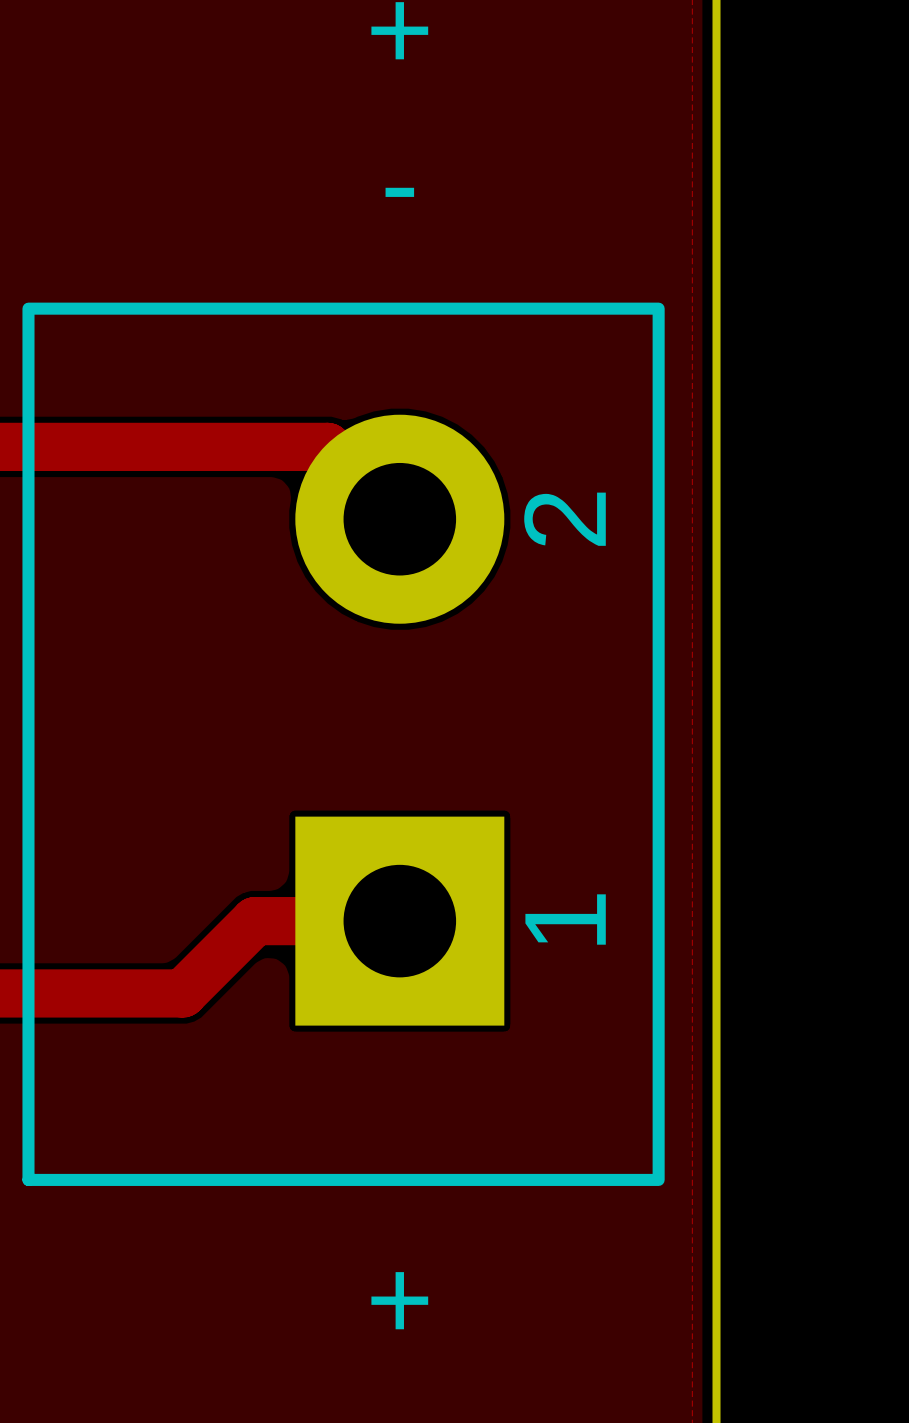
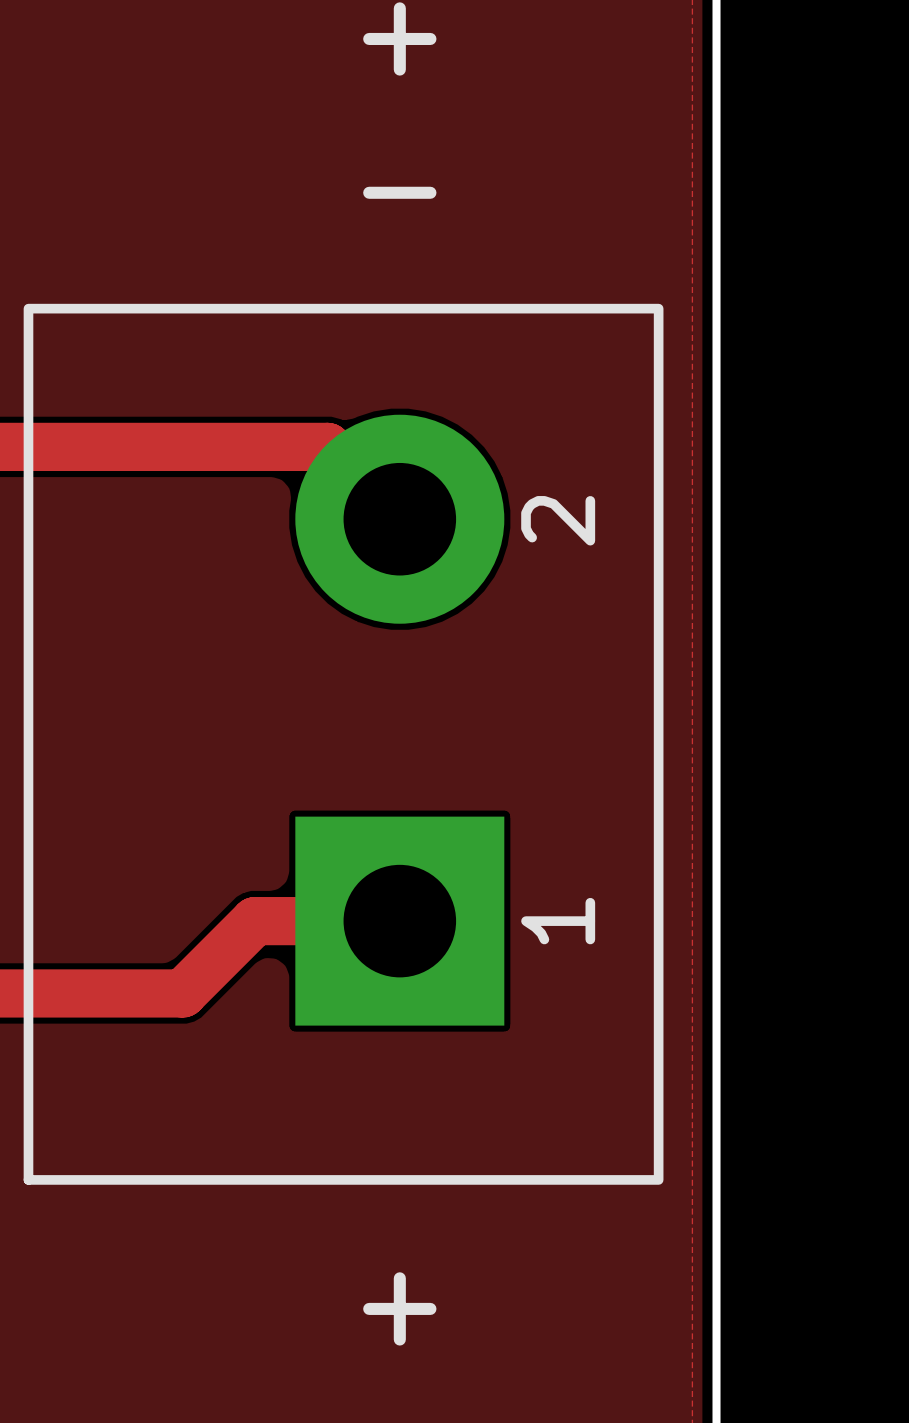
part footprint: [22, 302, 665, 1186] -> [23, 303, 664, 1185]

